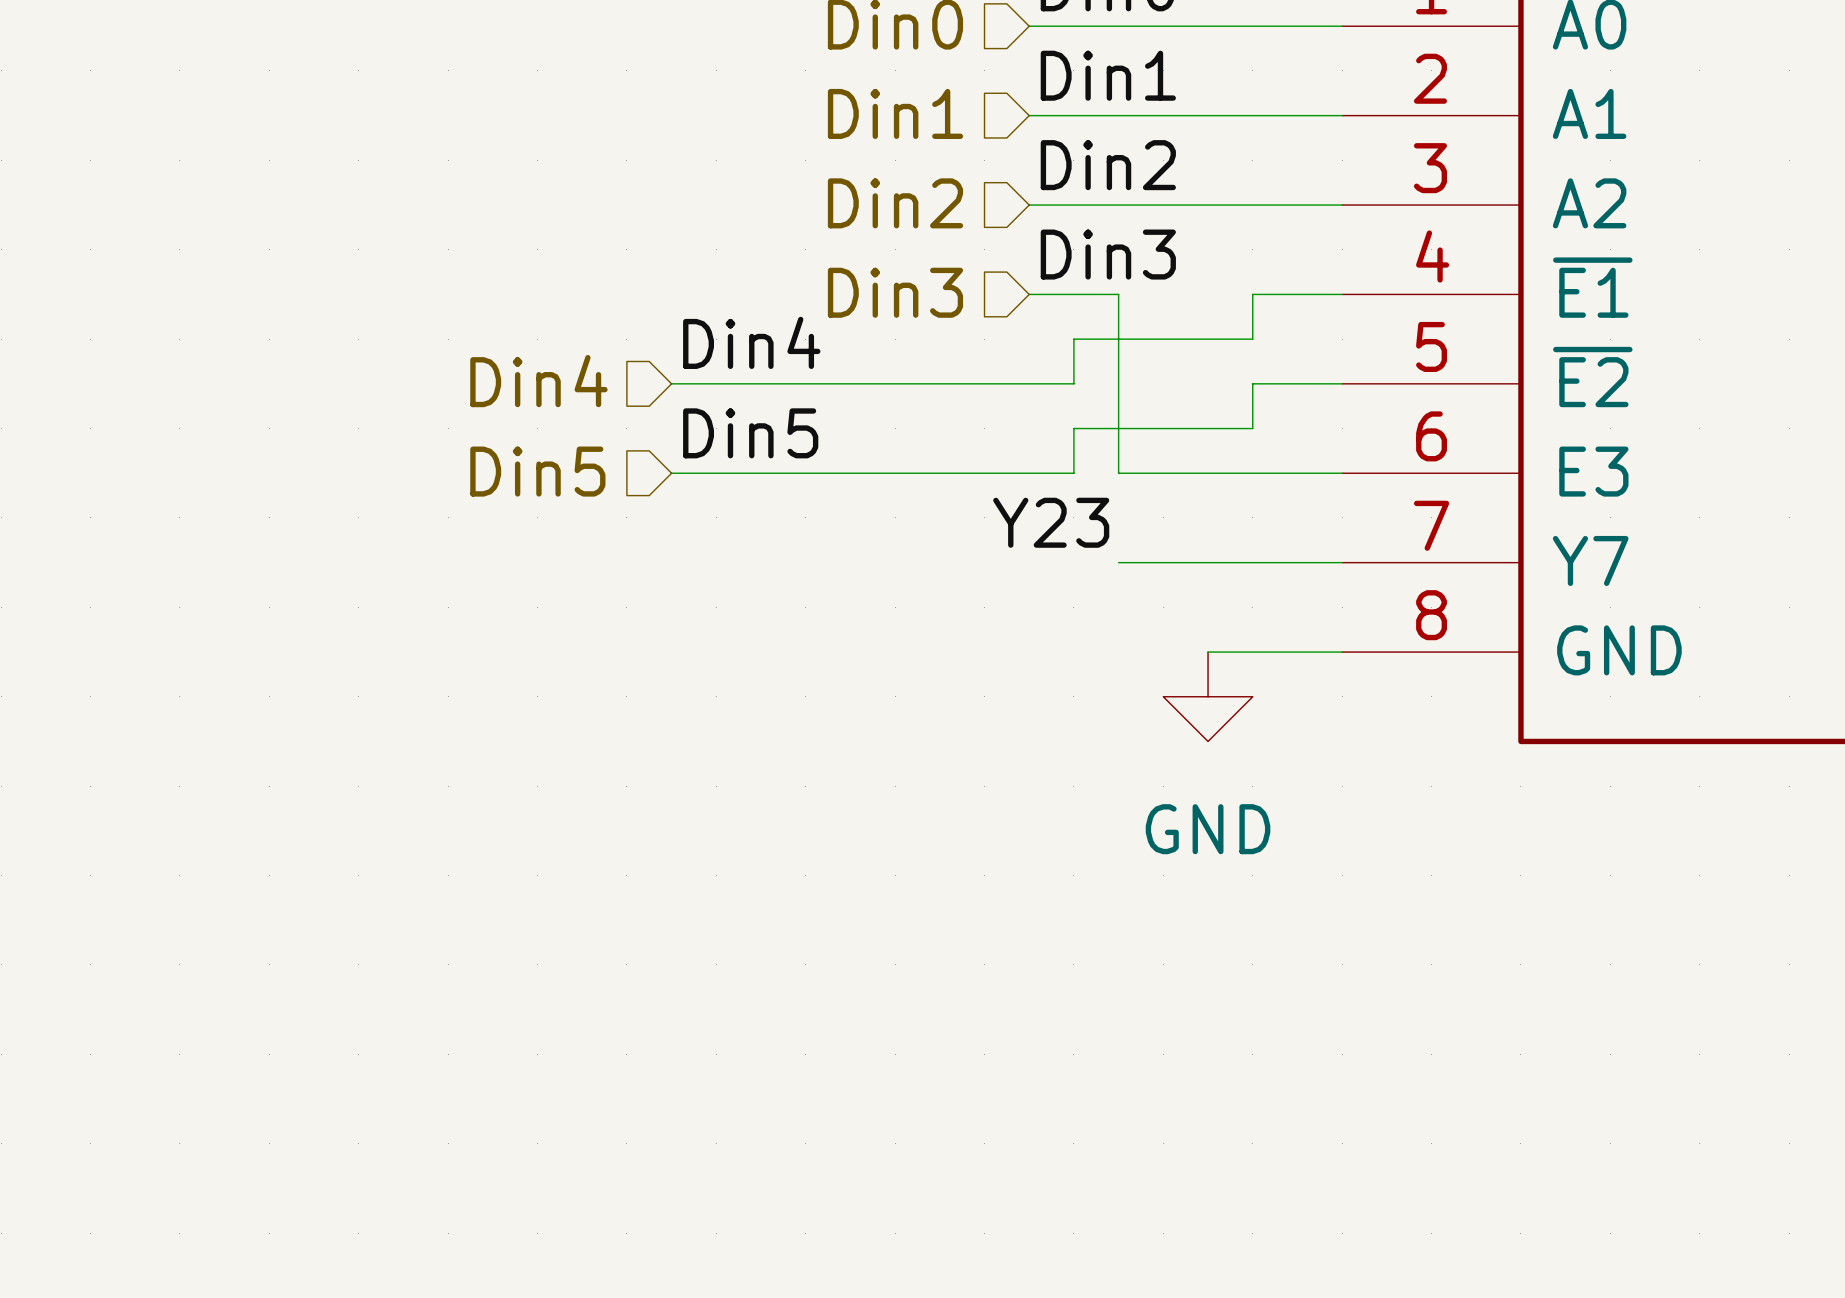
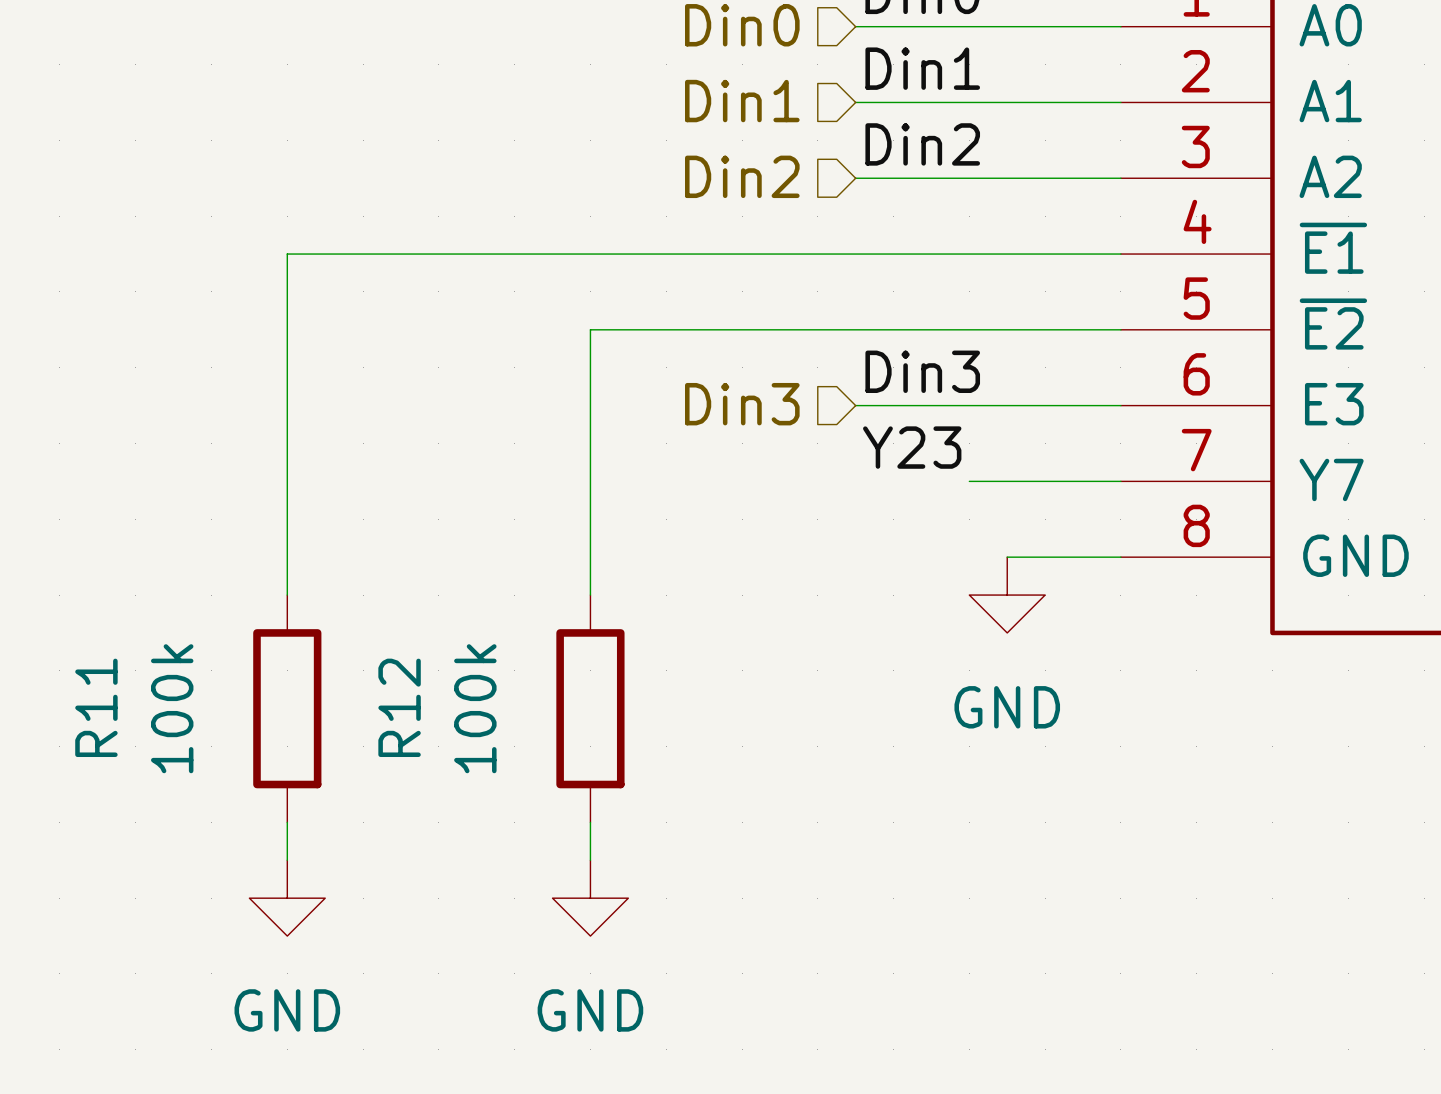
label position: Din3 (1108, 254) -> Din3 (922, 371)
hierarchical label position: Din3 (895, 292) -> Din3 (742, 404)
wire: none -> (855, 254) (287, 254) (287, 595)
wire: (1118, 294) (1118, 473) -> (931, 254) (1045, 254)
wire: (1252, 294) (1252, 339) (1073, 339) (1073, 383) -> (1045, 329) (893, 329)
label: Din4 (751, 342) -> none
hierarchical label: Din4 (538, 381) -> none
wire: (671, 383) (716, 383) -> (590, 595) (590, 329)
wire: (1252, 383) (1252, 428) (1073, 428) (1073, 473) -> (931, 405) (893, 405)
label: Din5 (750, 433) -> none
hierarchical label: Din5 (537, 471) -> none
wire: (671, 473) (1029, 473) -> none
label position: Y23 (1051, 522) -> Y23 (912, 447)
wire: (1118, 562) (1163, 562) -> none
R11: none -> 100k (287, 708)
R12: none -> 100k (590, 708)
wire: none -> (287, 822) (287, 860)
wire: none -> (590, 822) (590, 860)
power symbol: none -> GND (287, 898)
power symbol: none -> GND (590, 898)

